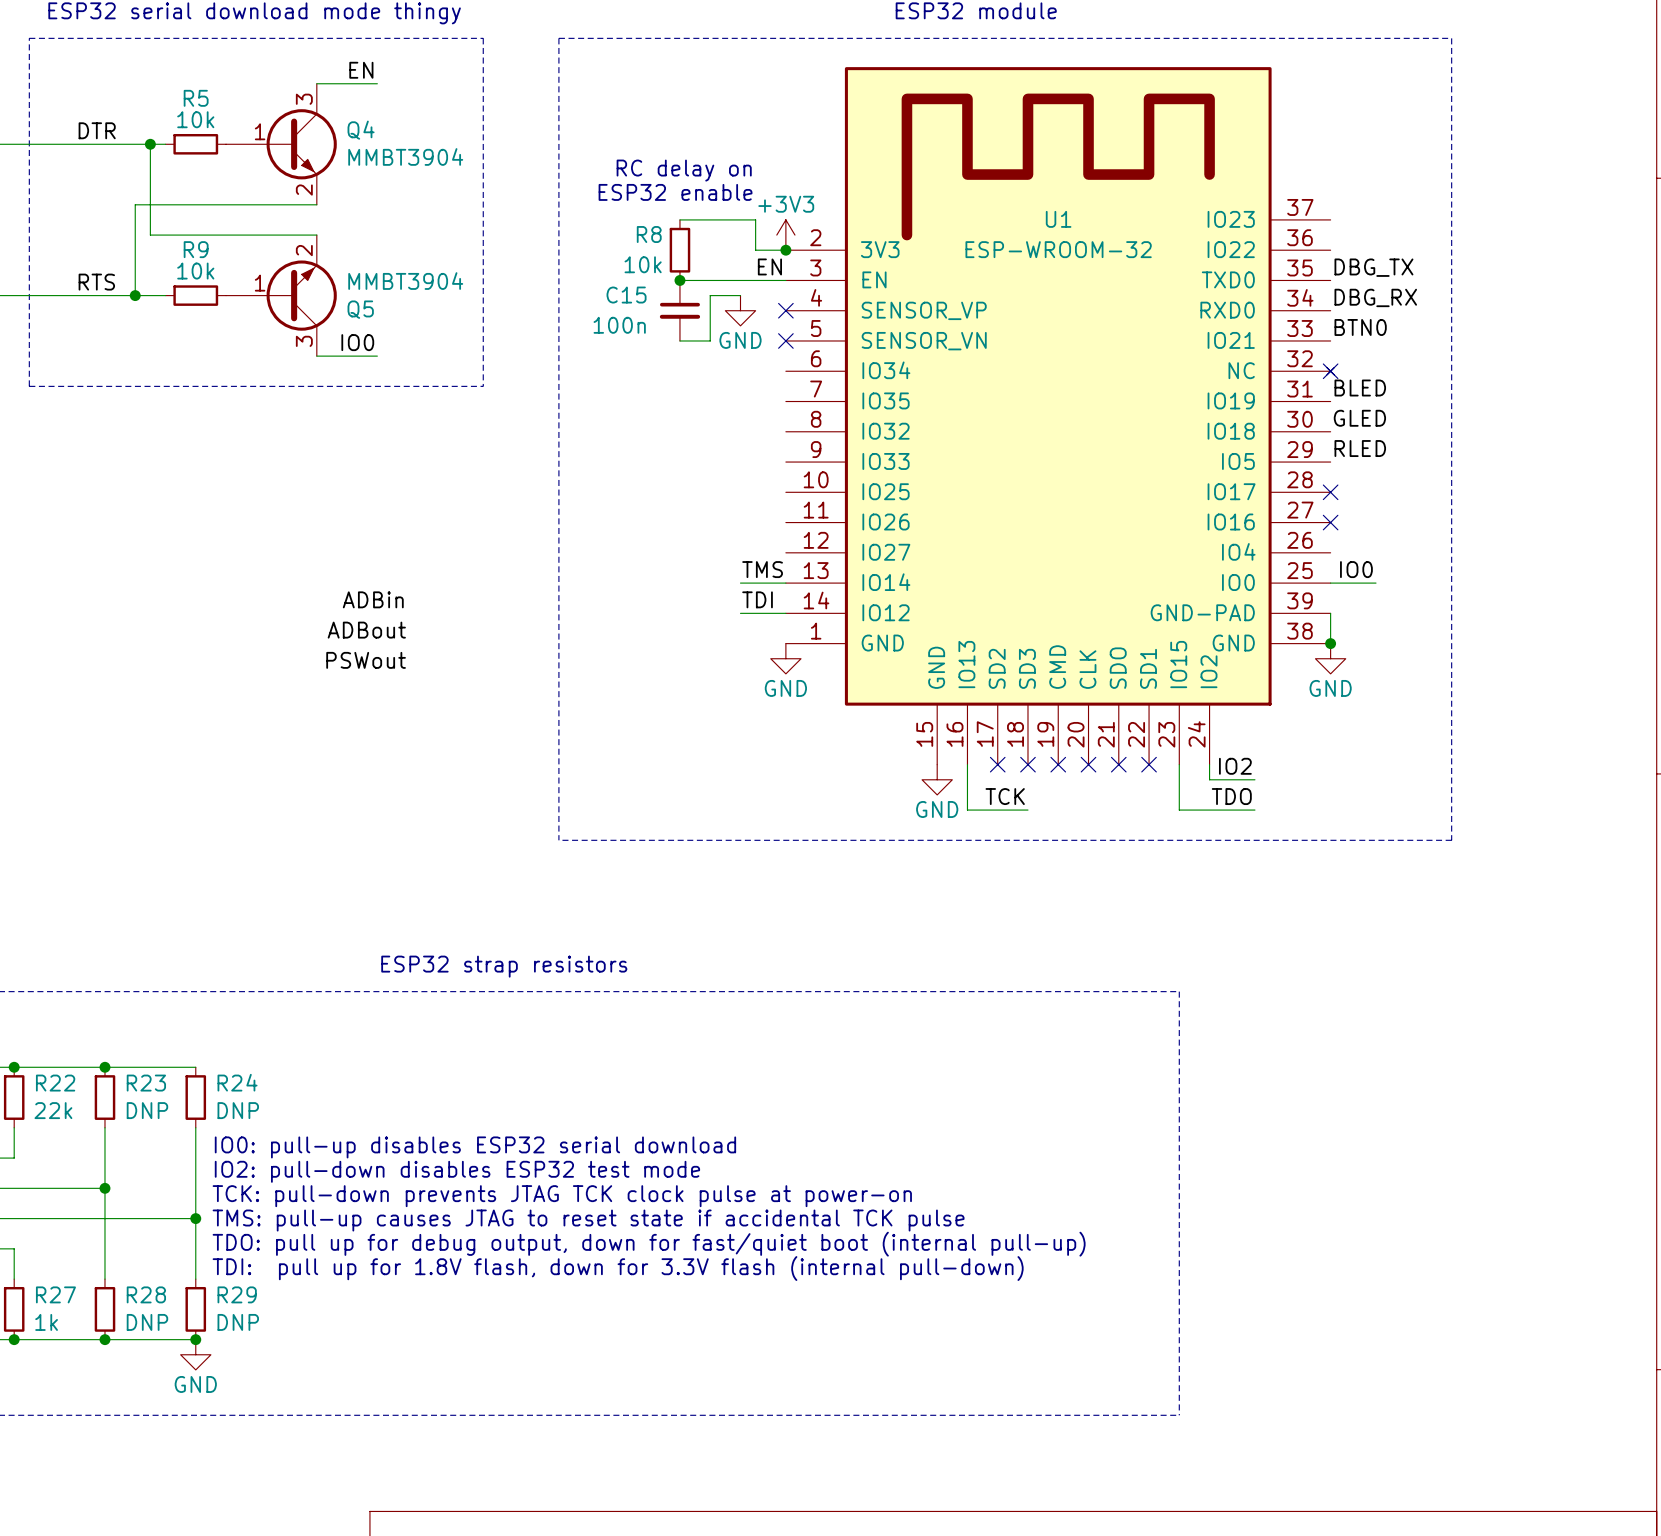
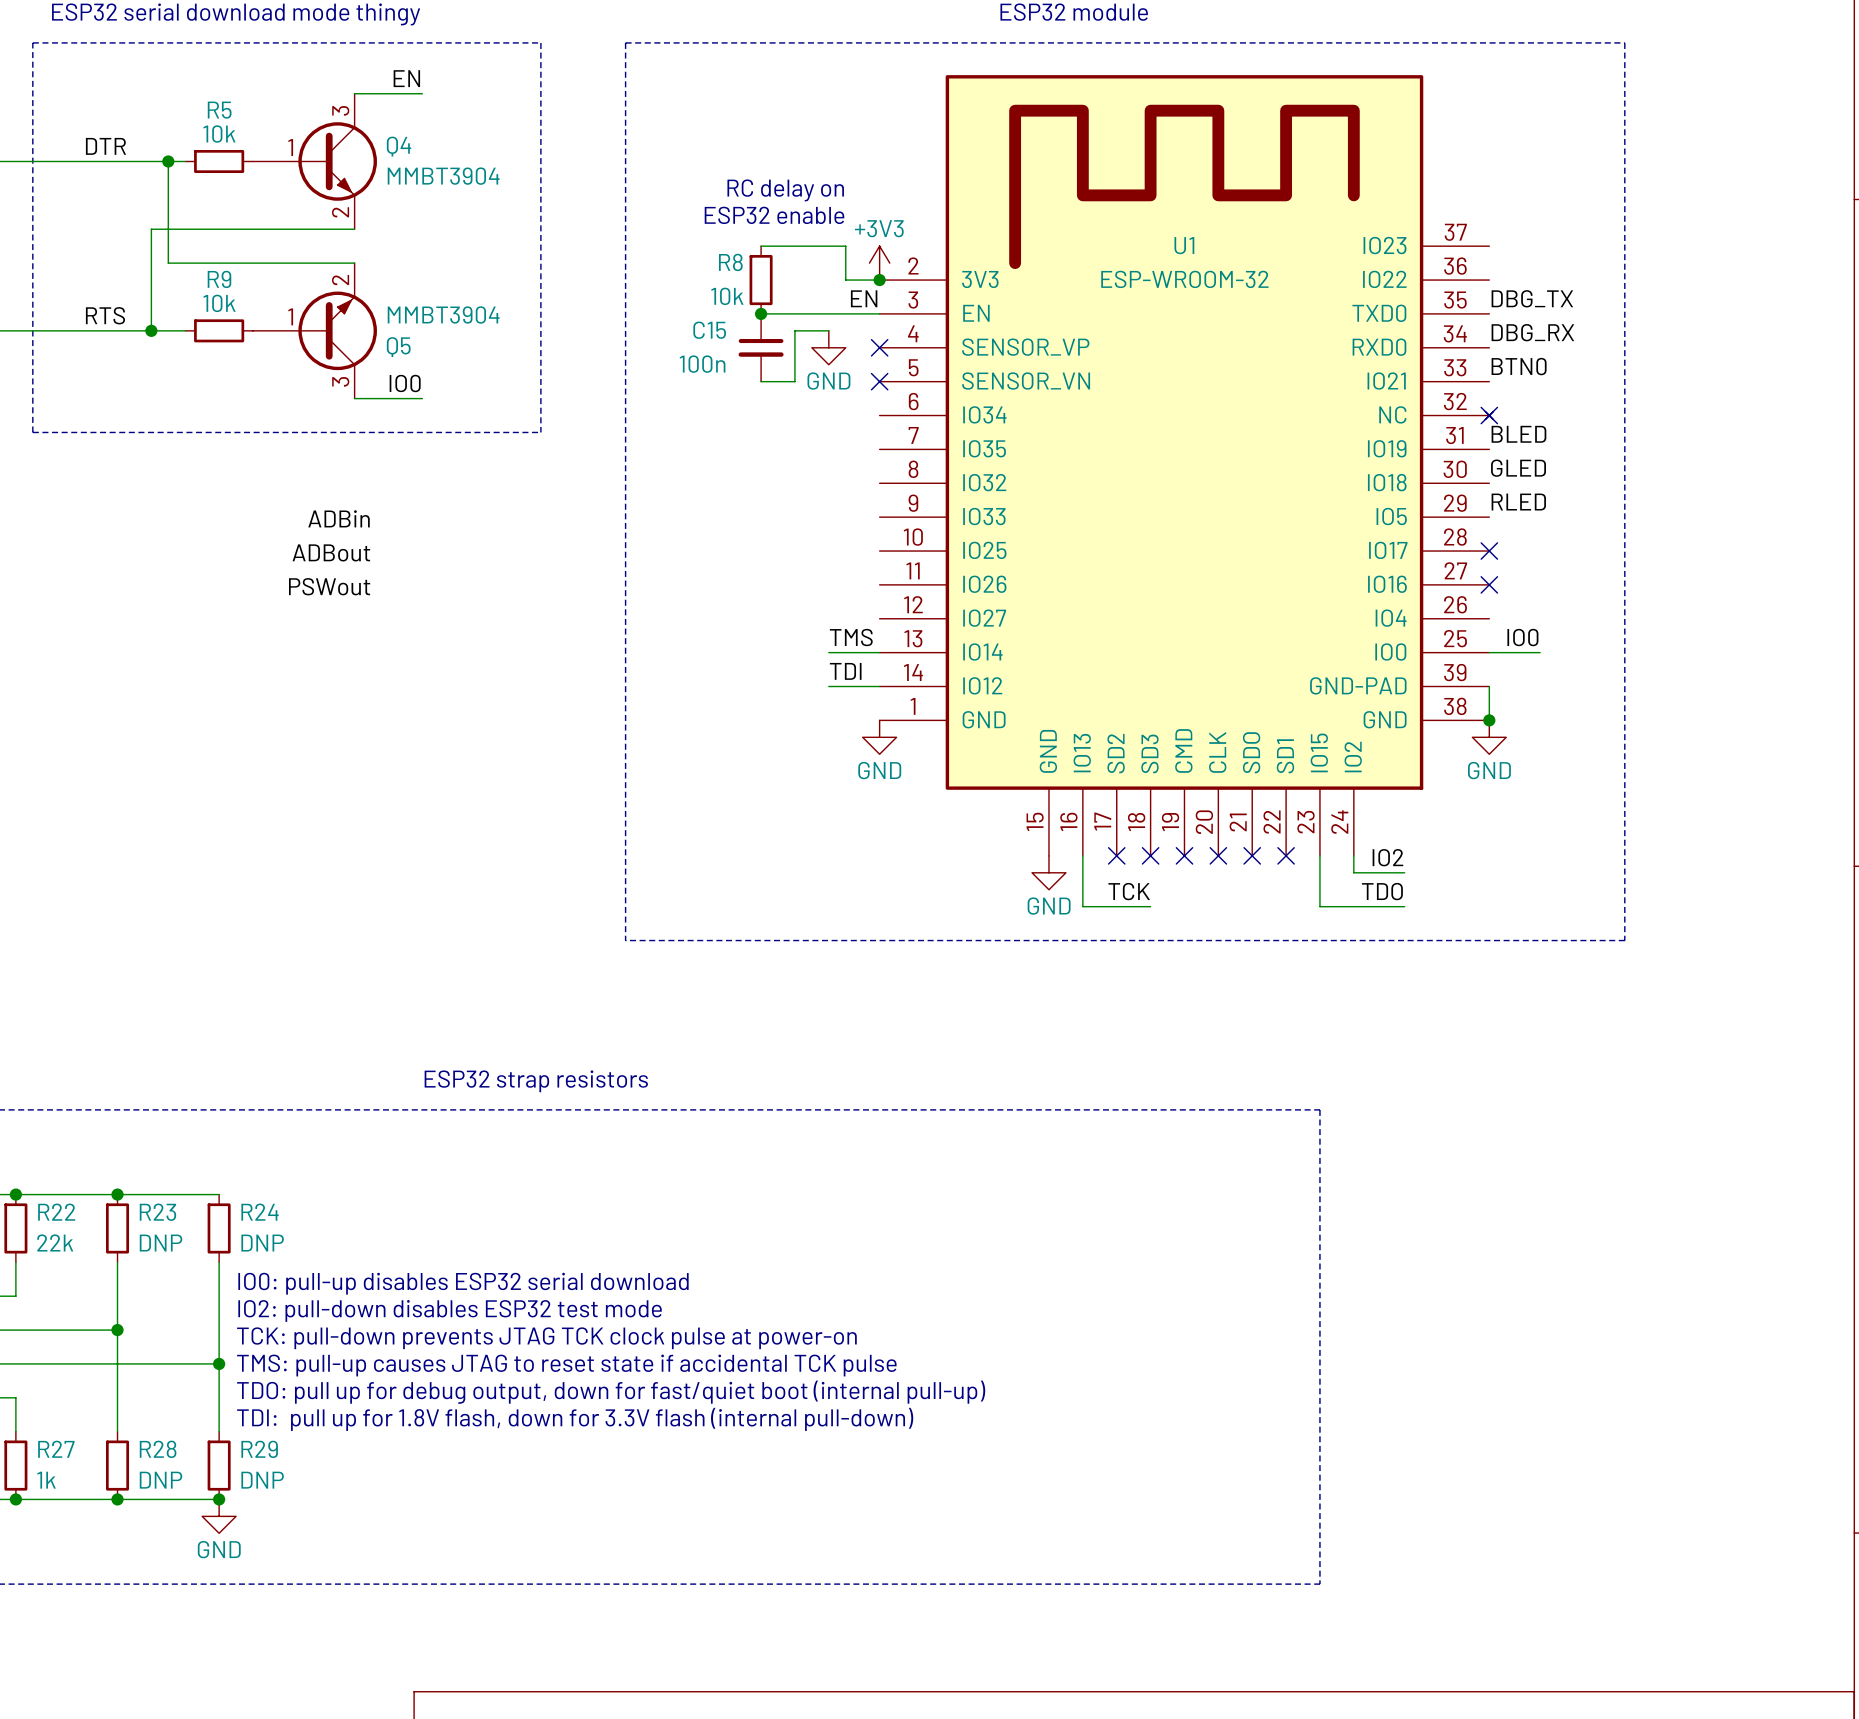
label position: ADBin (373, 599) -> ADBin (339, 518)
label position: ADBout (366, 630) -> ADBout (331, 552)
label position: PSWout (366, 660) -> PSWout (329, 586)

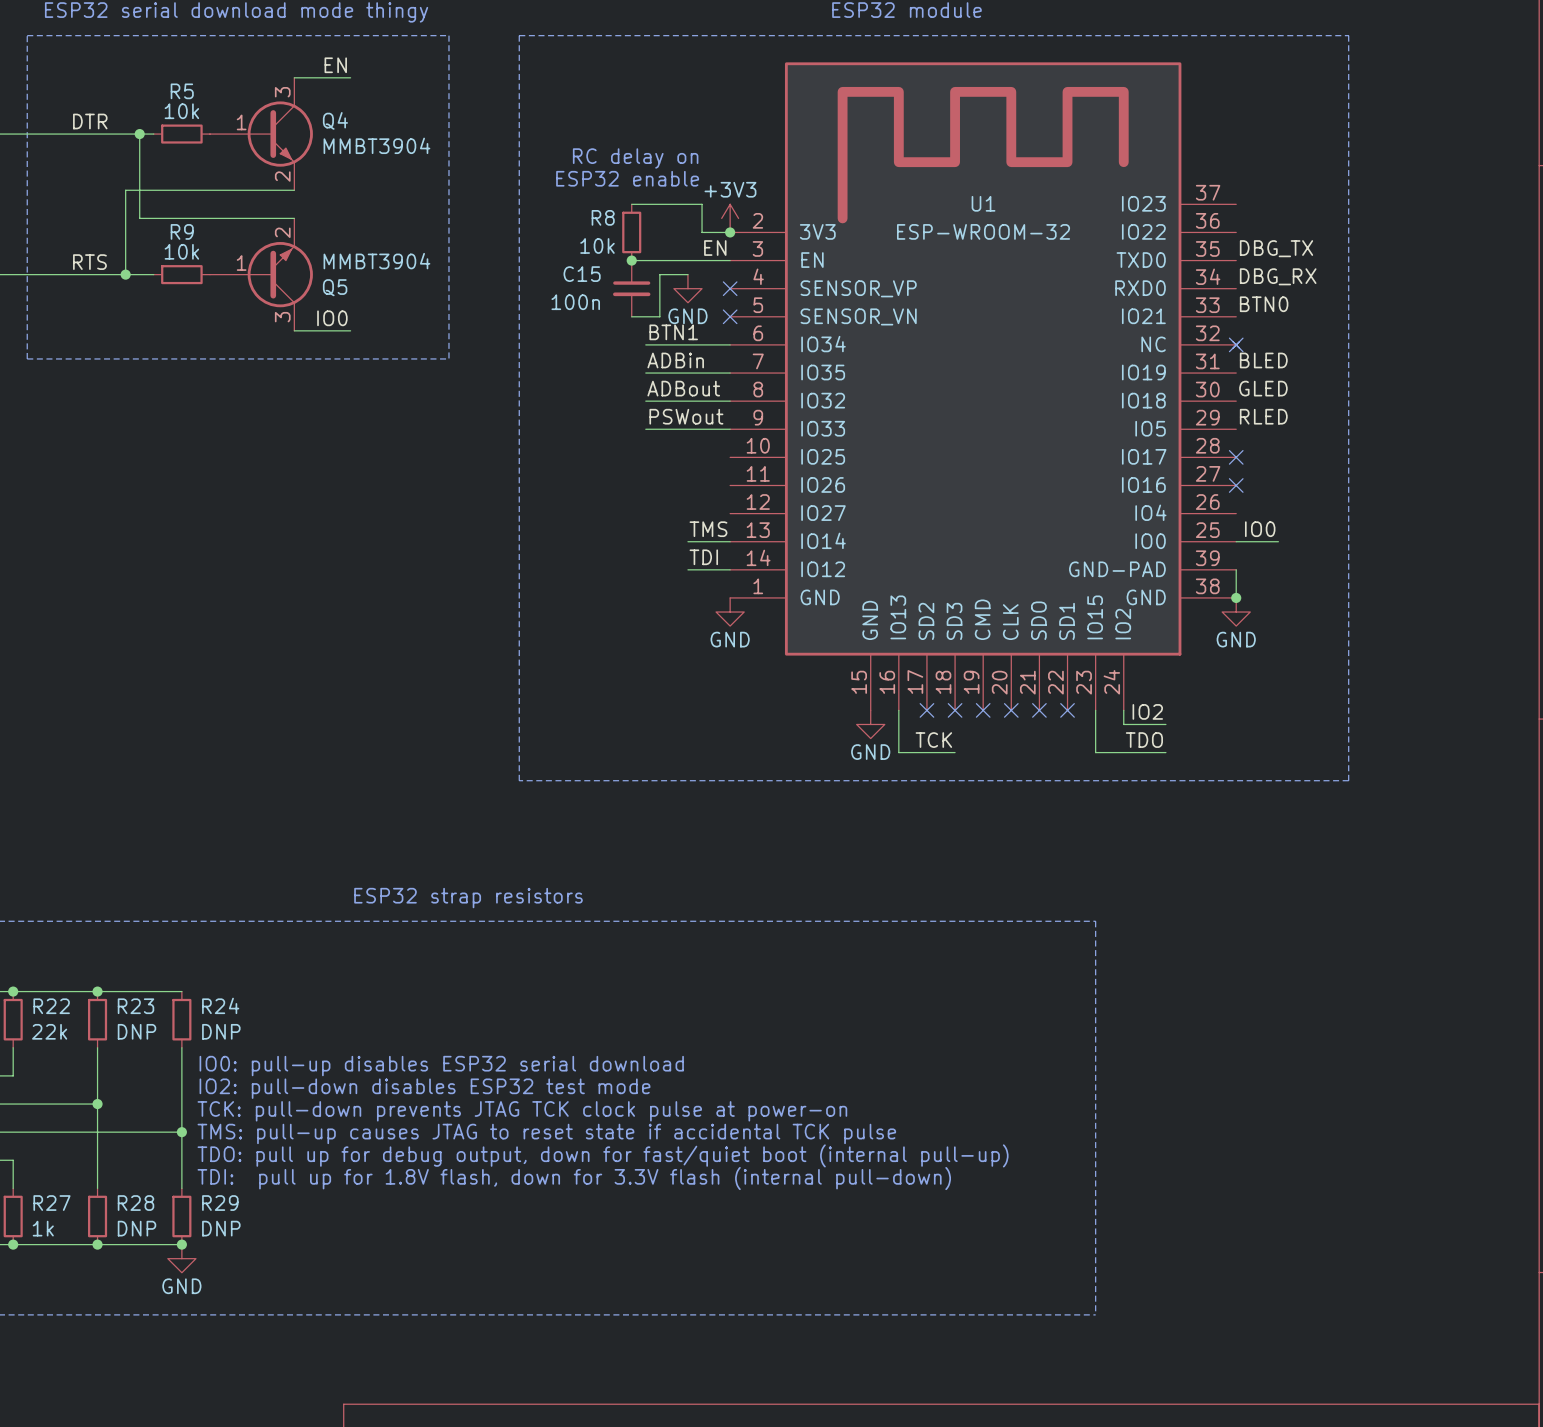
label: none -> BTN1 (673, 332)
wire: none -> (645, 344) (730, 344)
label: none -> ADBin (675, 360)
wire: none -> (645, 373) (730, 373)
label: none -> ADBout (683, 388)
wire: none -> (645, 401) (730, 401)
label: none -> PSWout (686, 416)
wire: none -> (645, 429) (730, 429)
label: ADBin (339, 518) -> none
label: ADBout (331, 552) -> none
label: PSWout (329, 586) -> none

